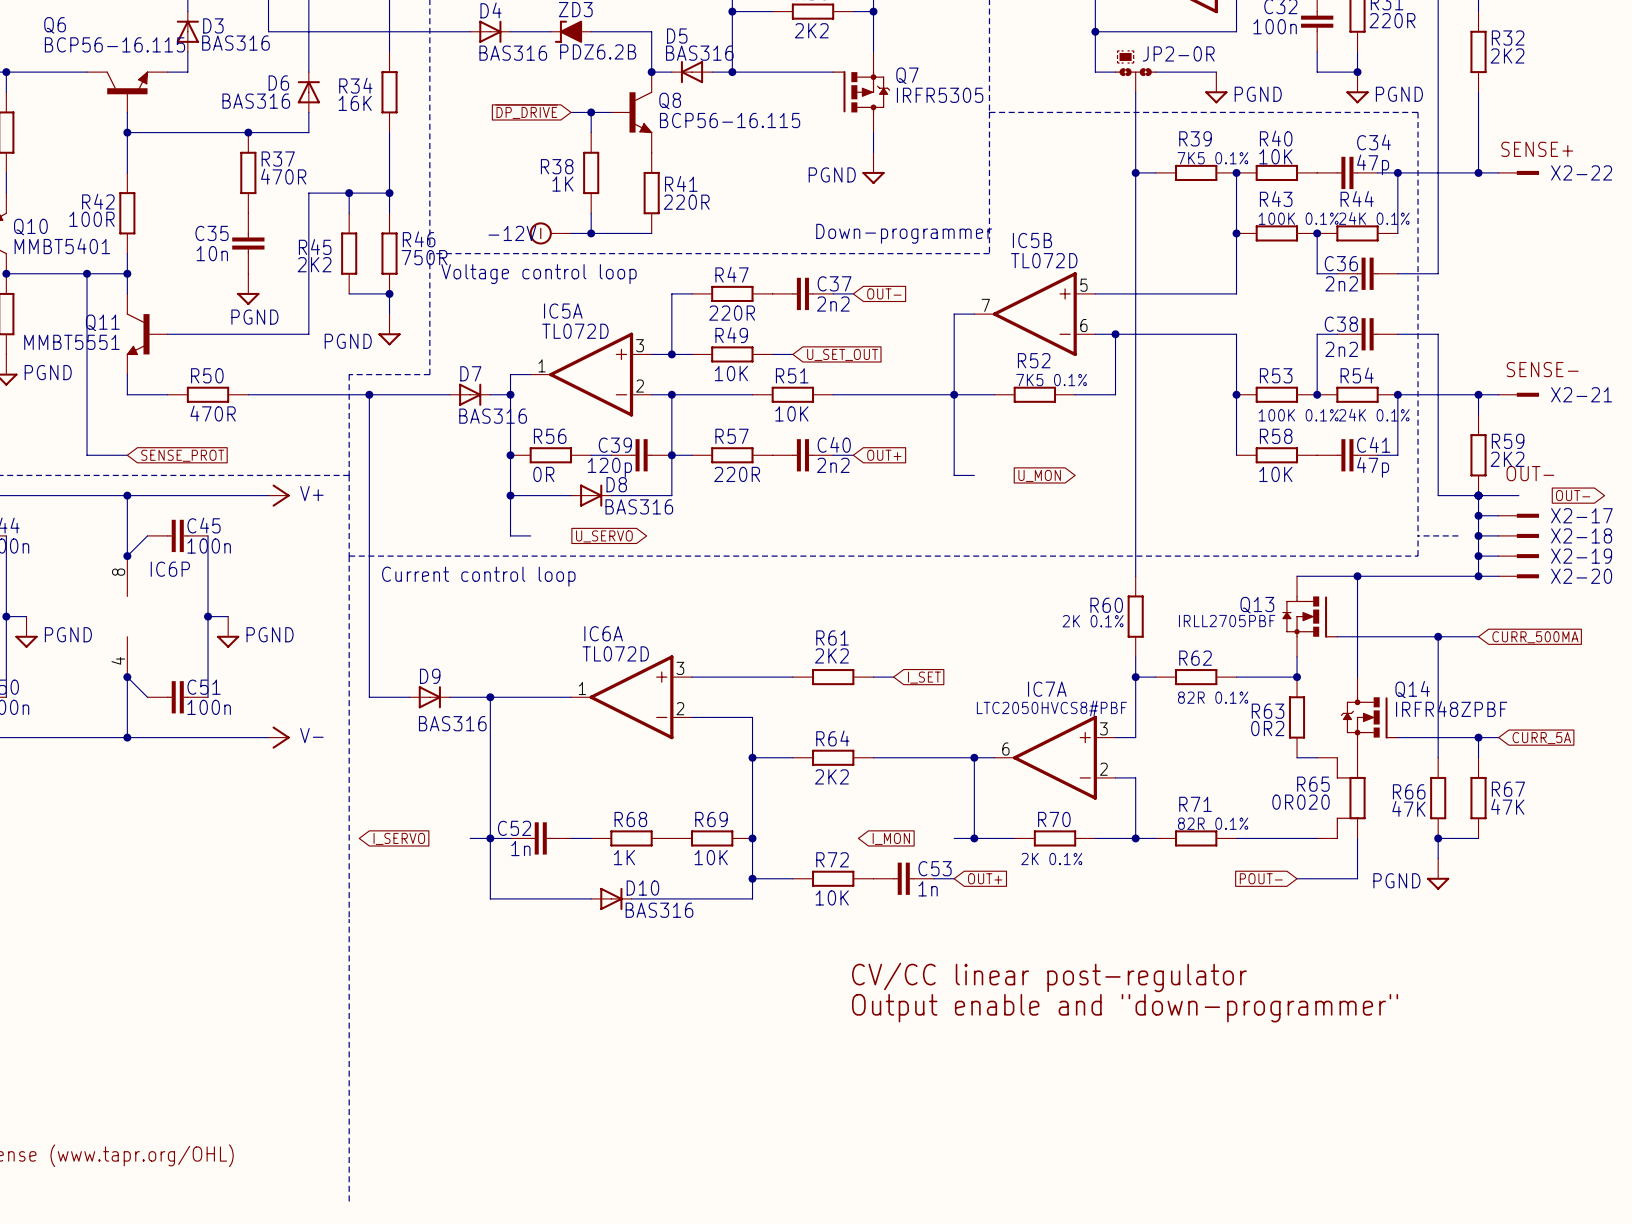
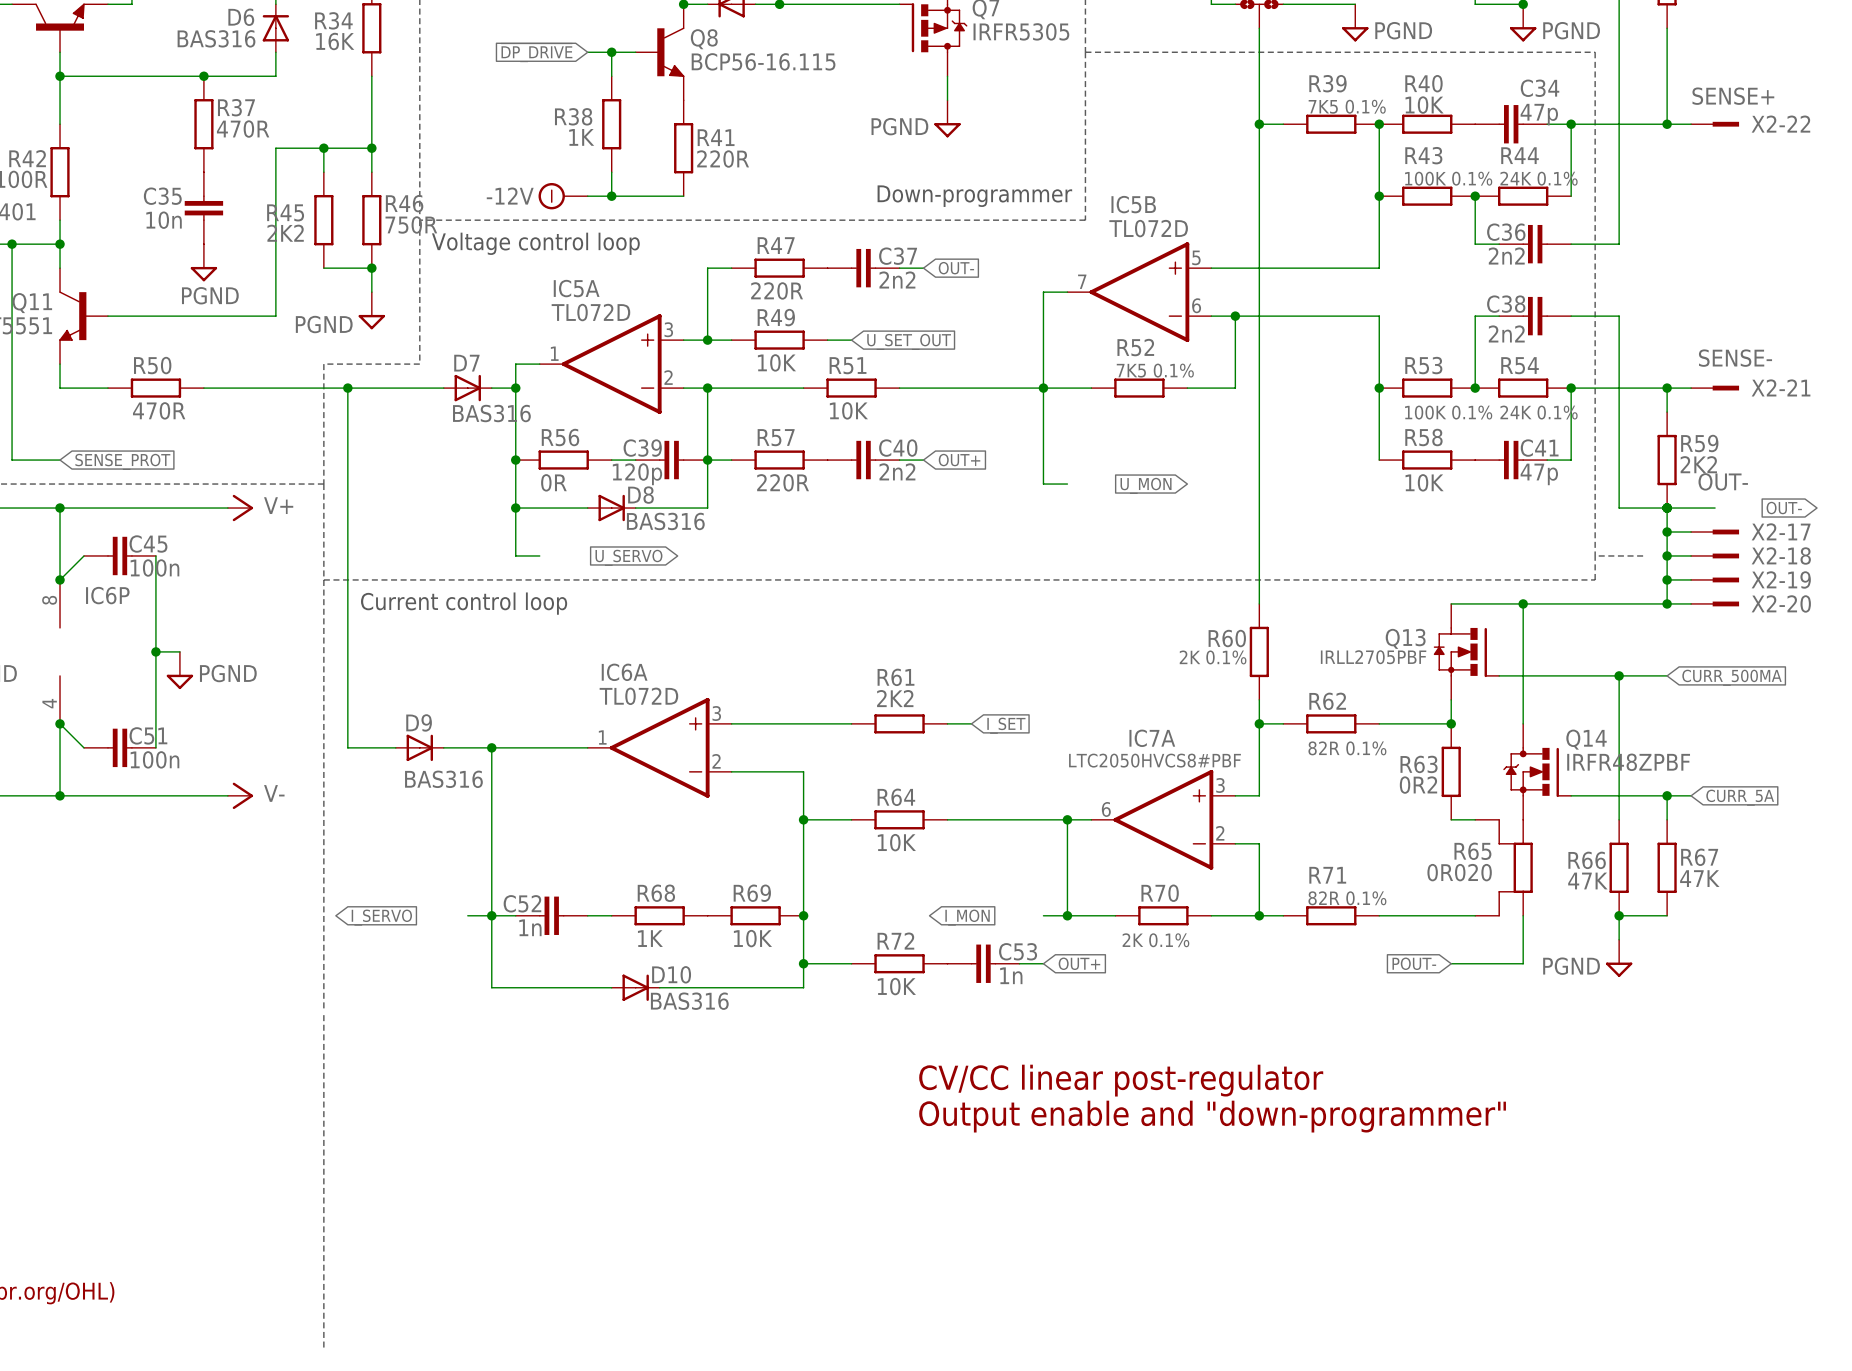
R64 value: 2K2 (831, 776) -> 10K (896, 842)

